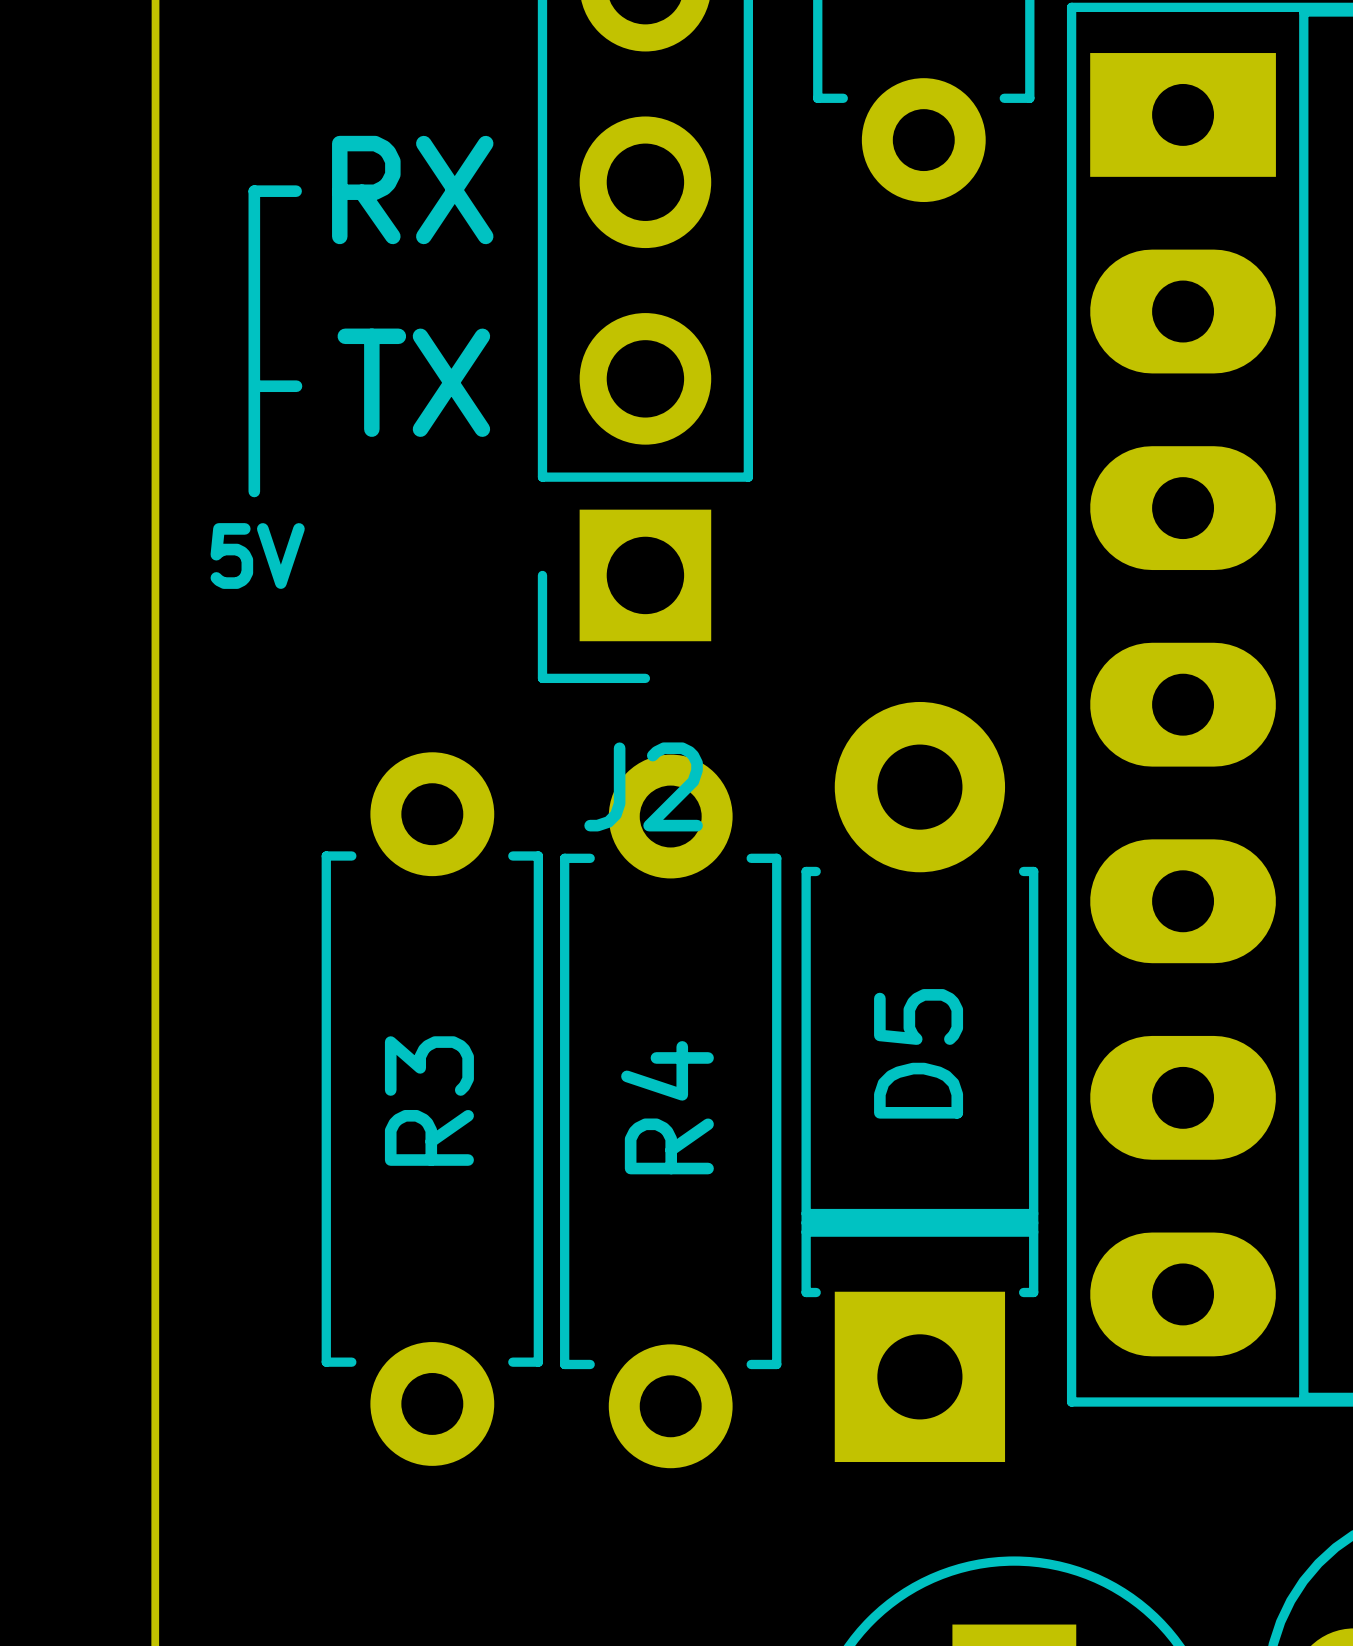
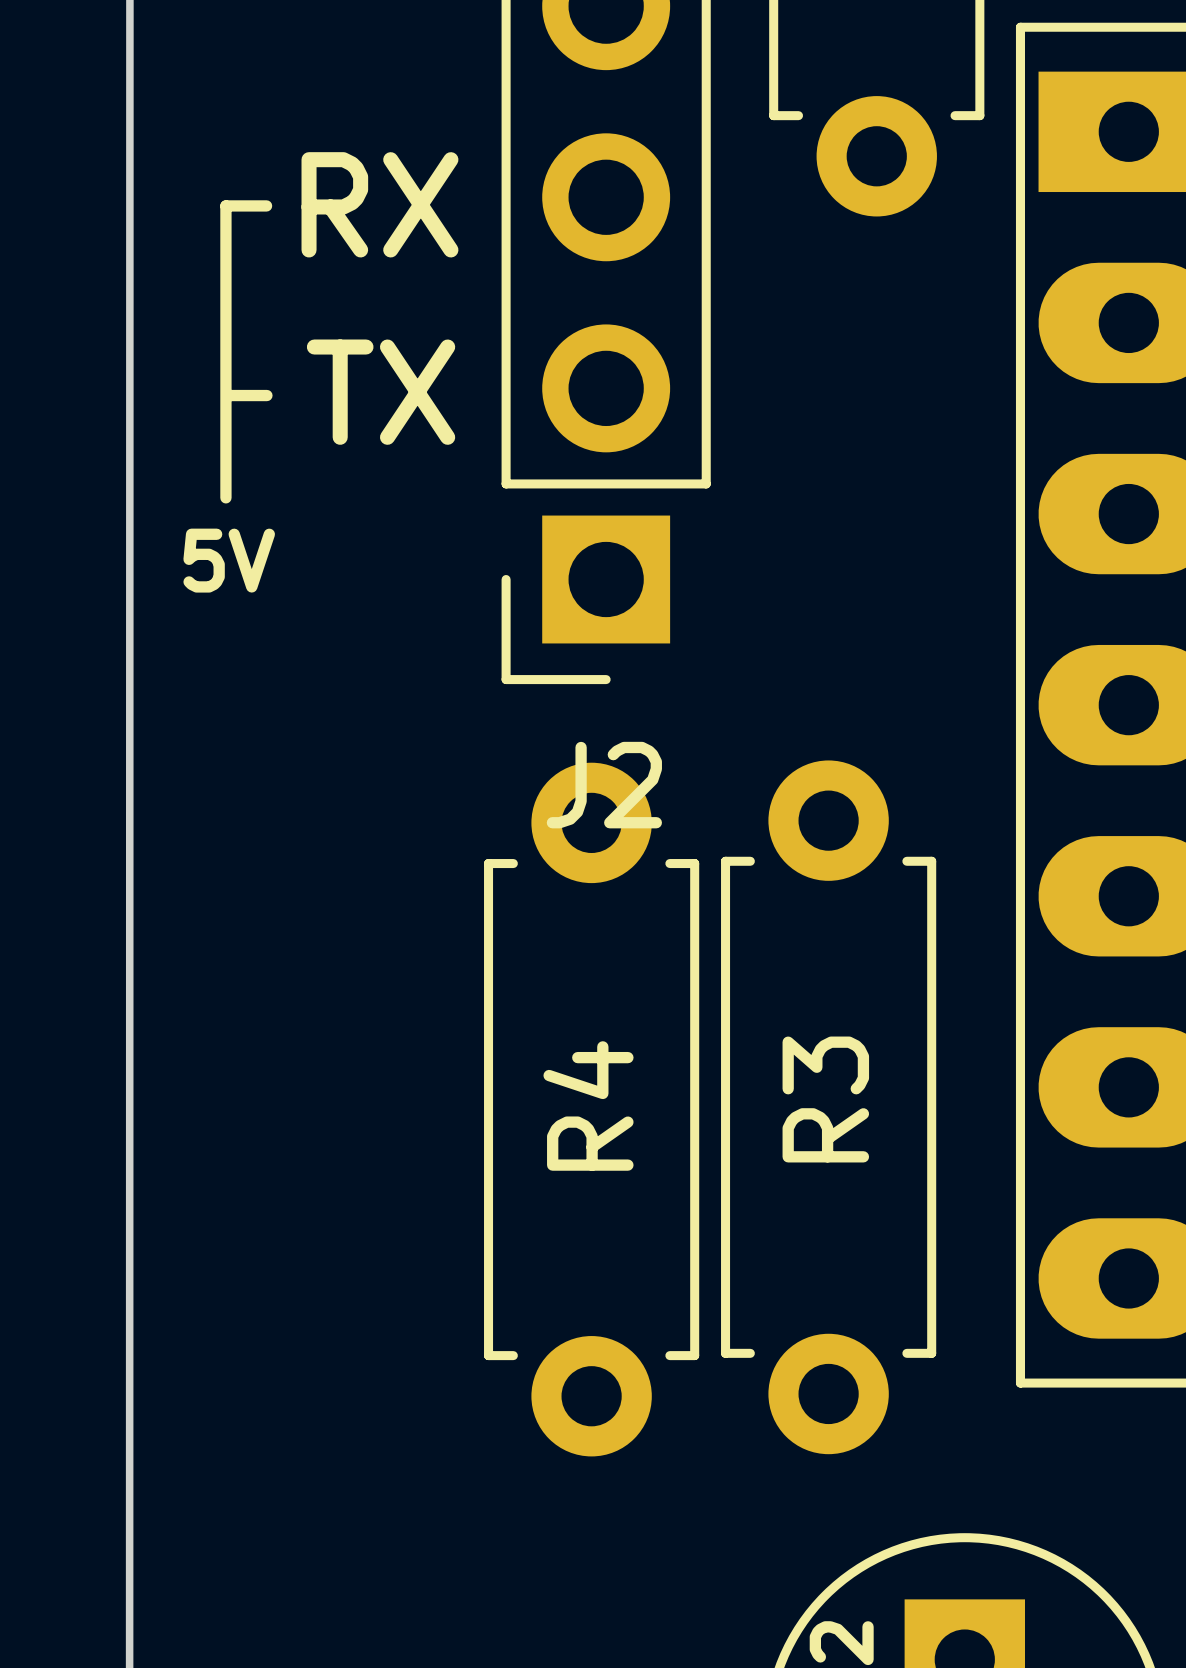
D5: (919, 1081) -> none
R3 position: (432, 1109) -> (828, 1107)
R4 position: (670, 1111) -> (591, 1109)

